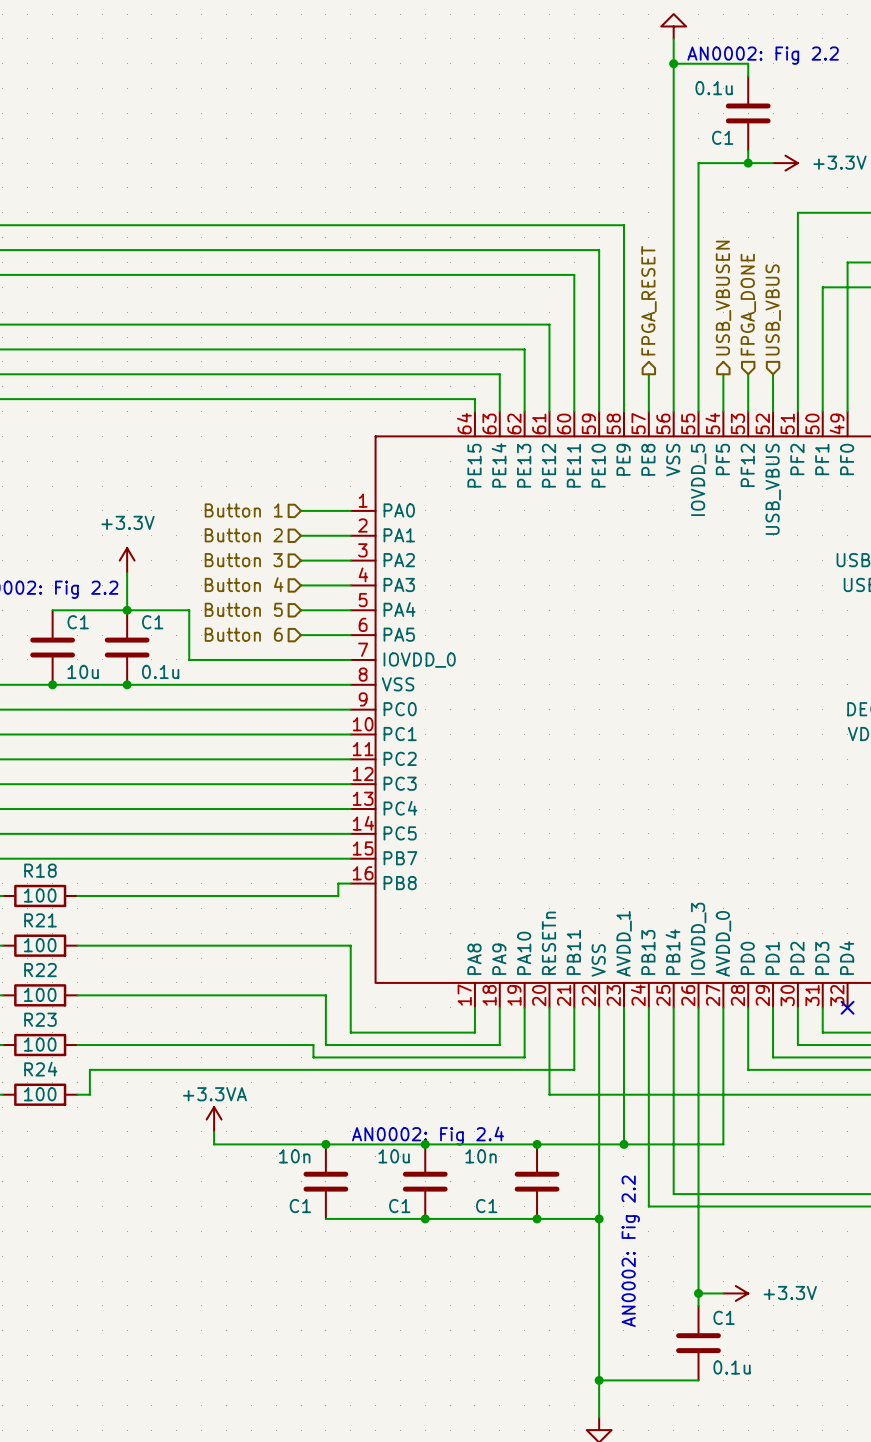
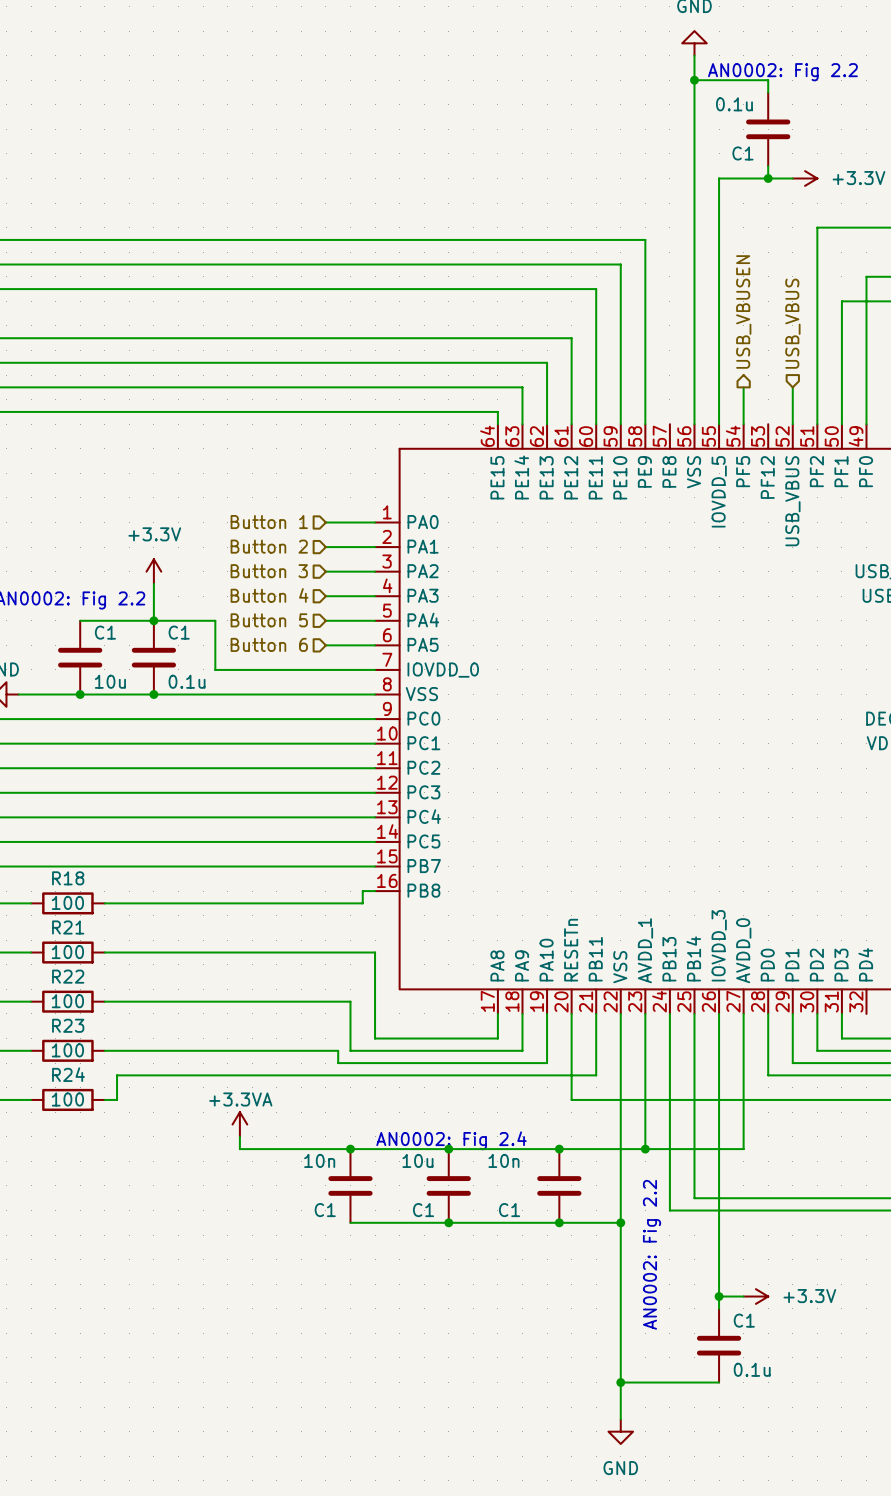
hierarchical label: FPGA_RESET (648, 300) -> none
hierarchical label: FPGA_DONE (748, 304) -> none
wire: (648, 374) (648, 411) -> none
wire: (748, 374) (748, 411) -> none
no-connect mark: (847, 1007) -> none

